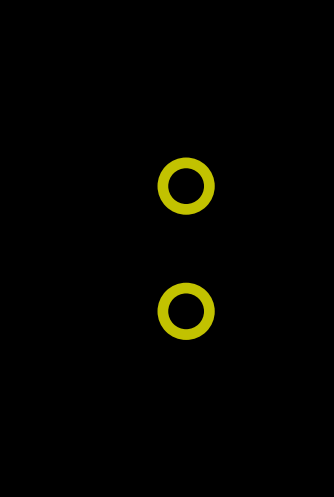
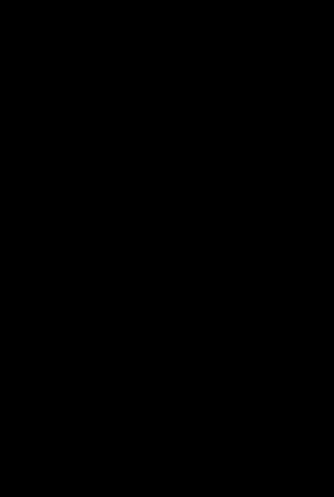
part: (186, 248) -> none

